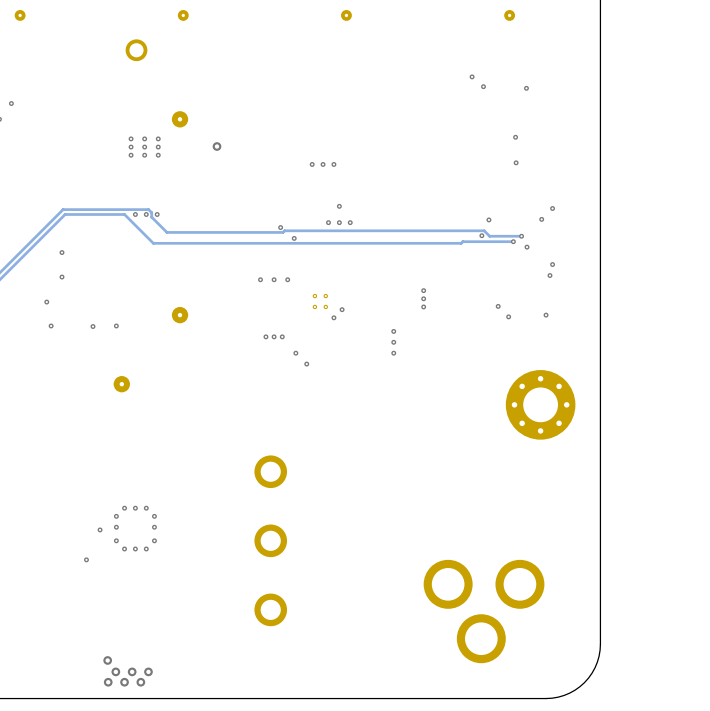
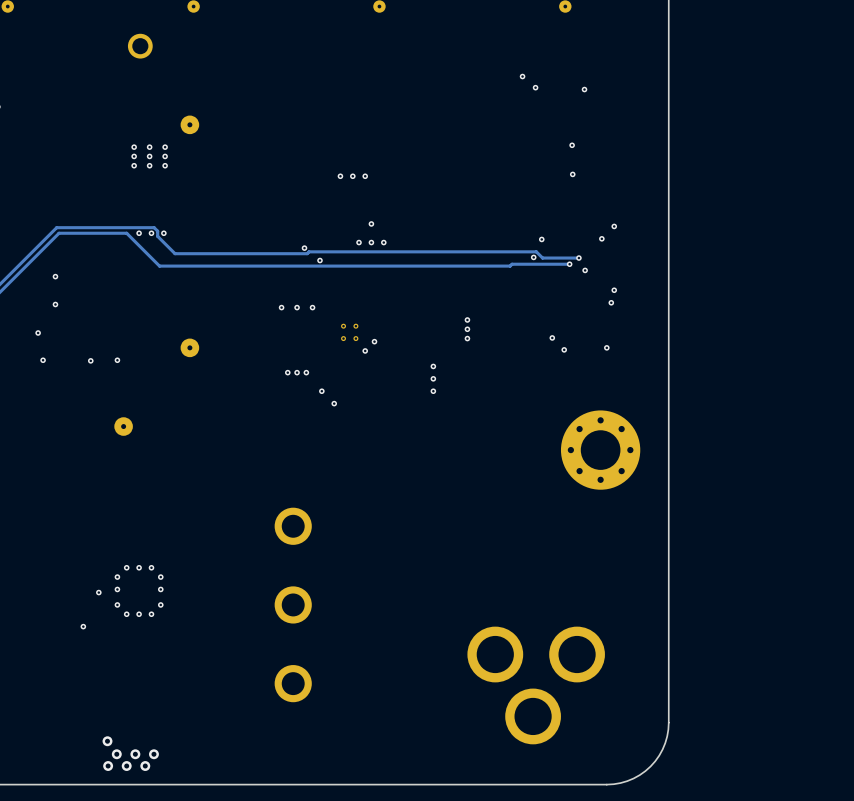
via: (217, 146) -> none

